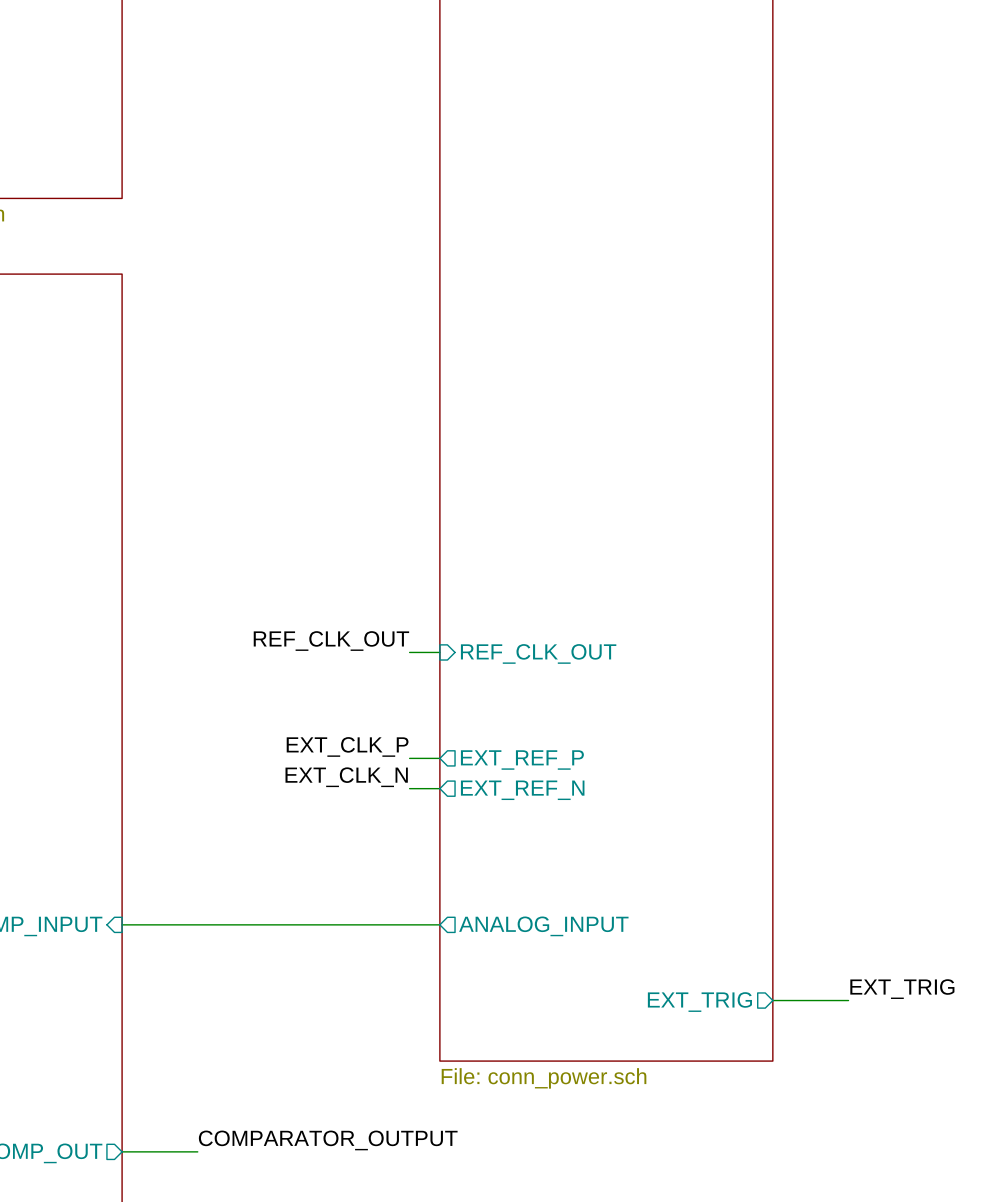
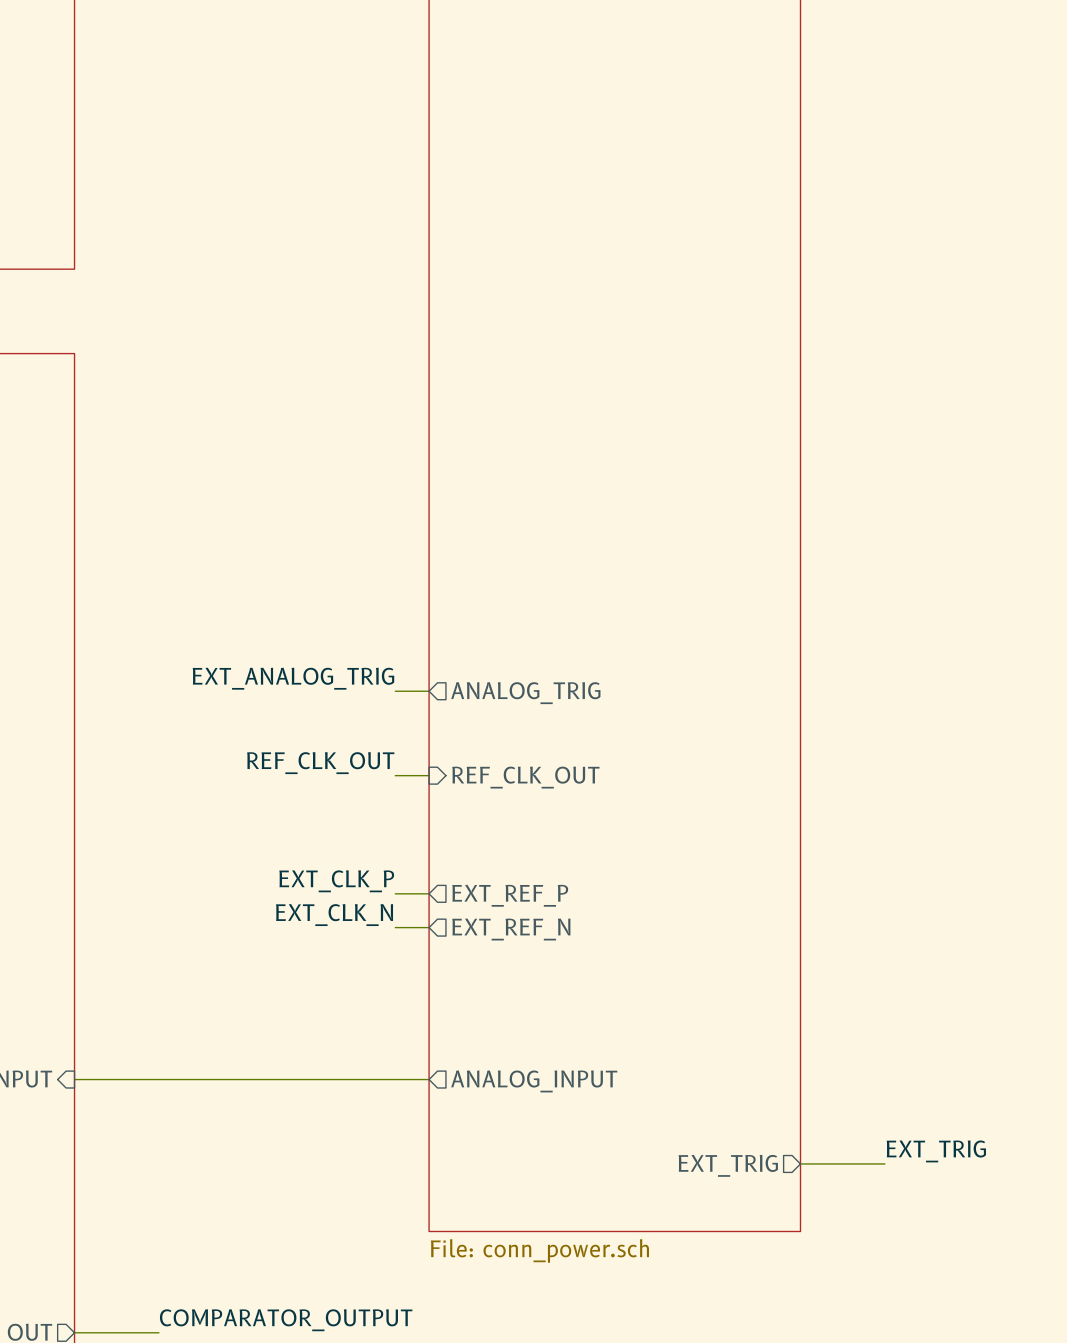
label: none -> EXT_ANALOG_TRIG (293, 678)
wire: none -> (395, 691) (429, 691)
sheet pin: none -> ANALOG_TRIG (525, 693)

